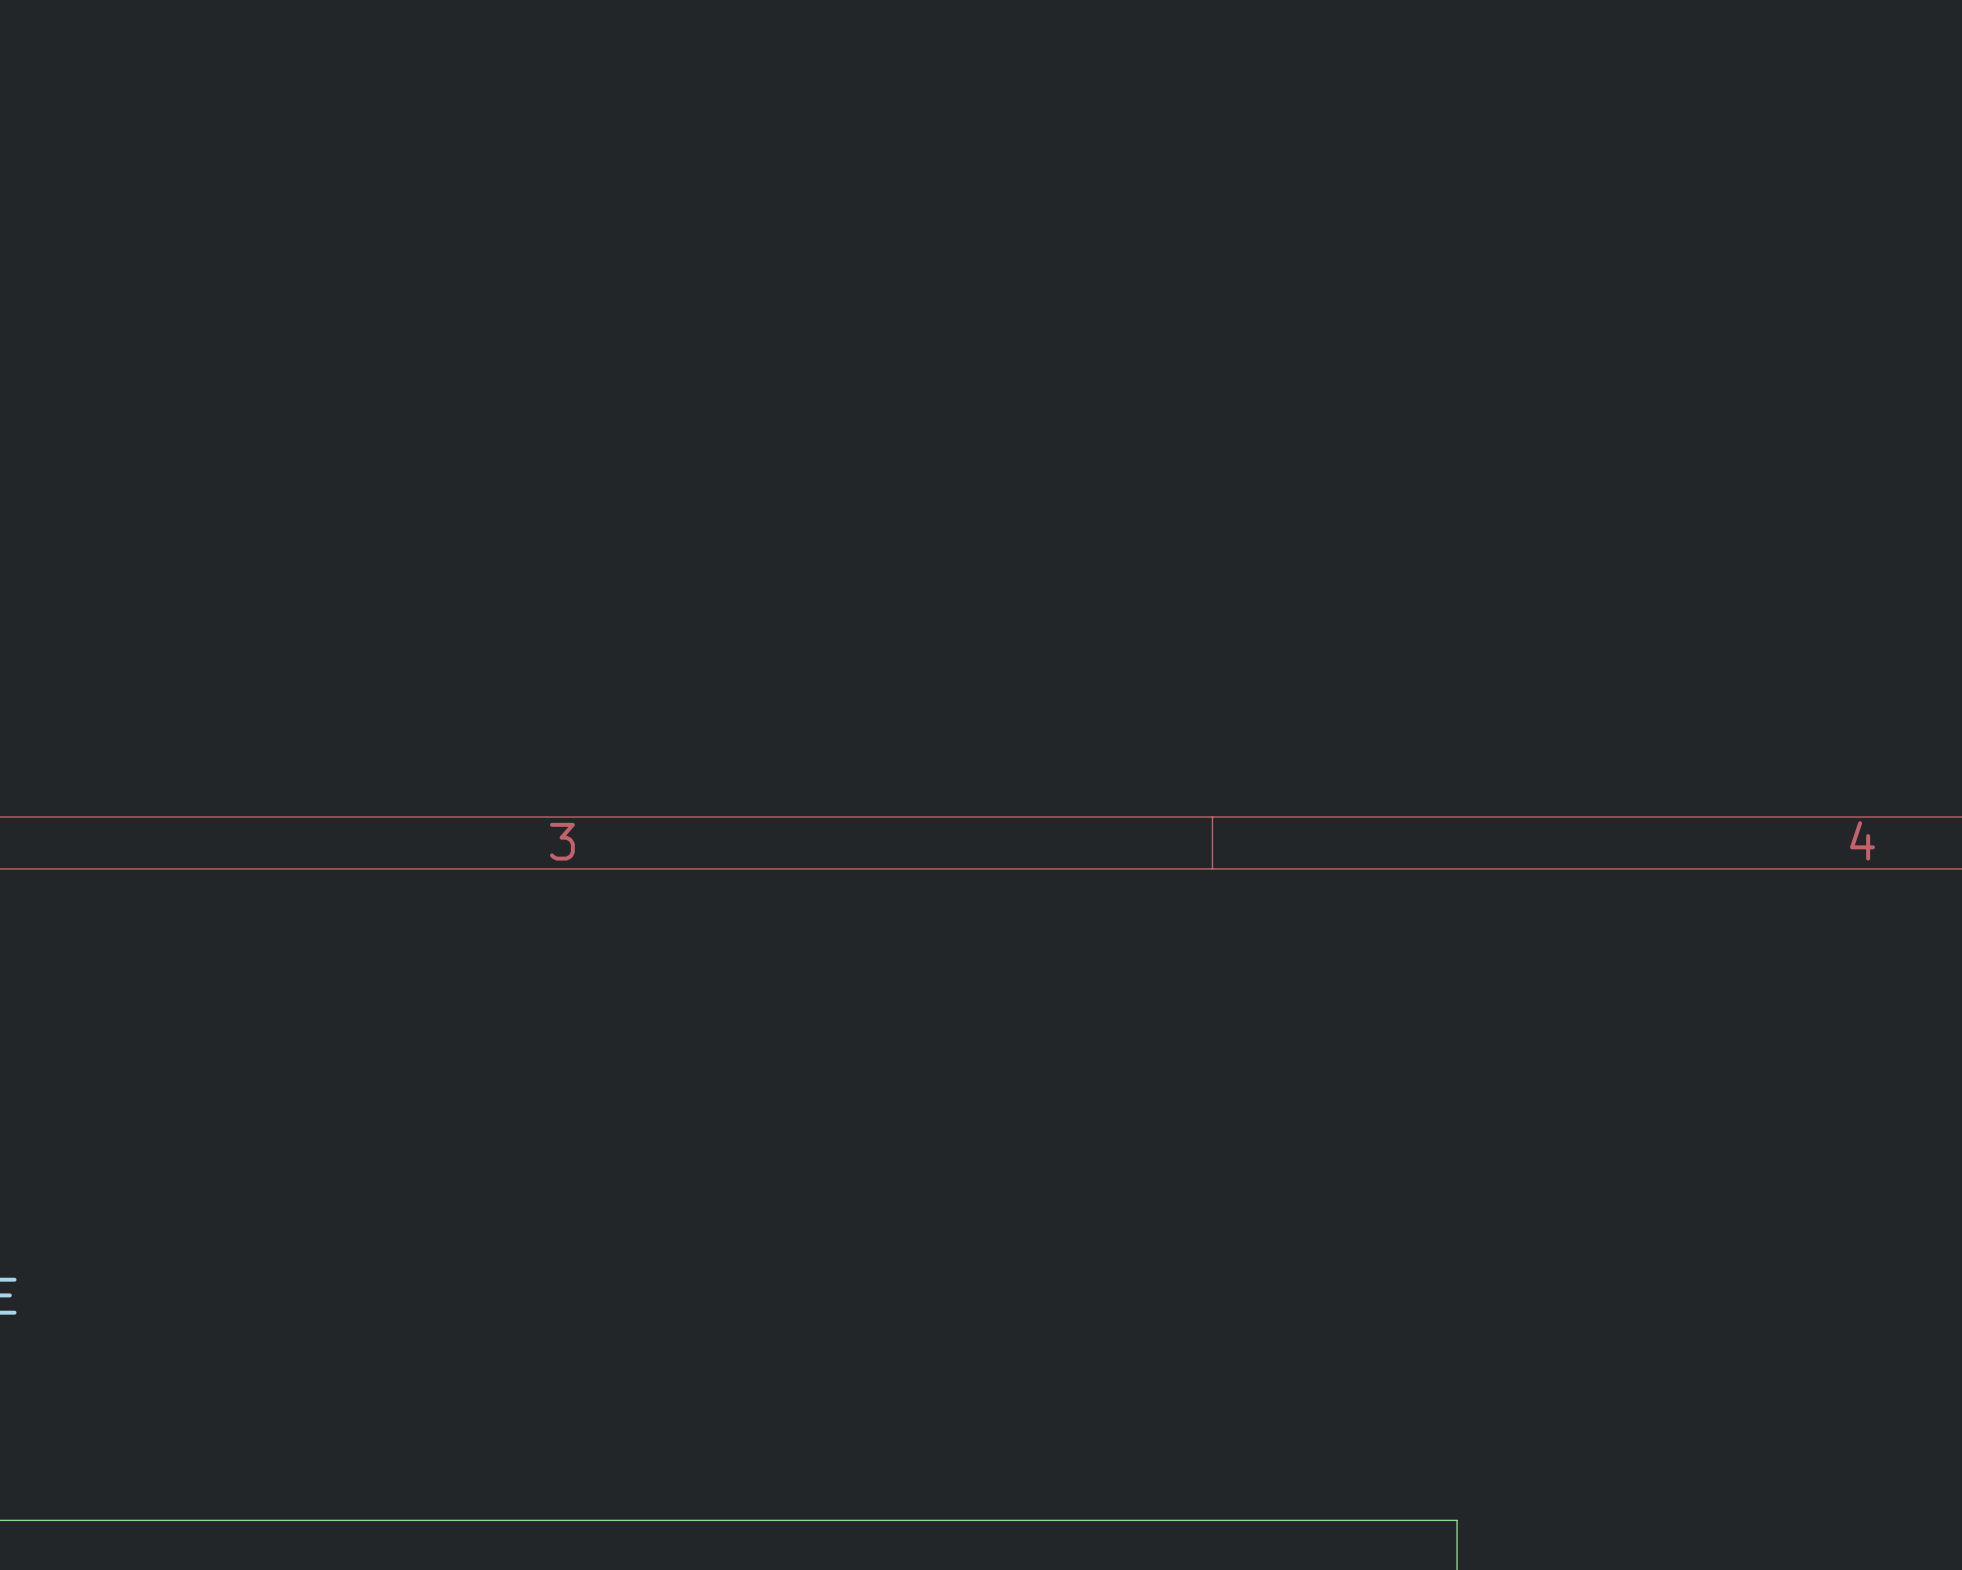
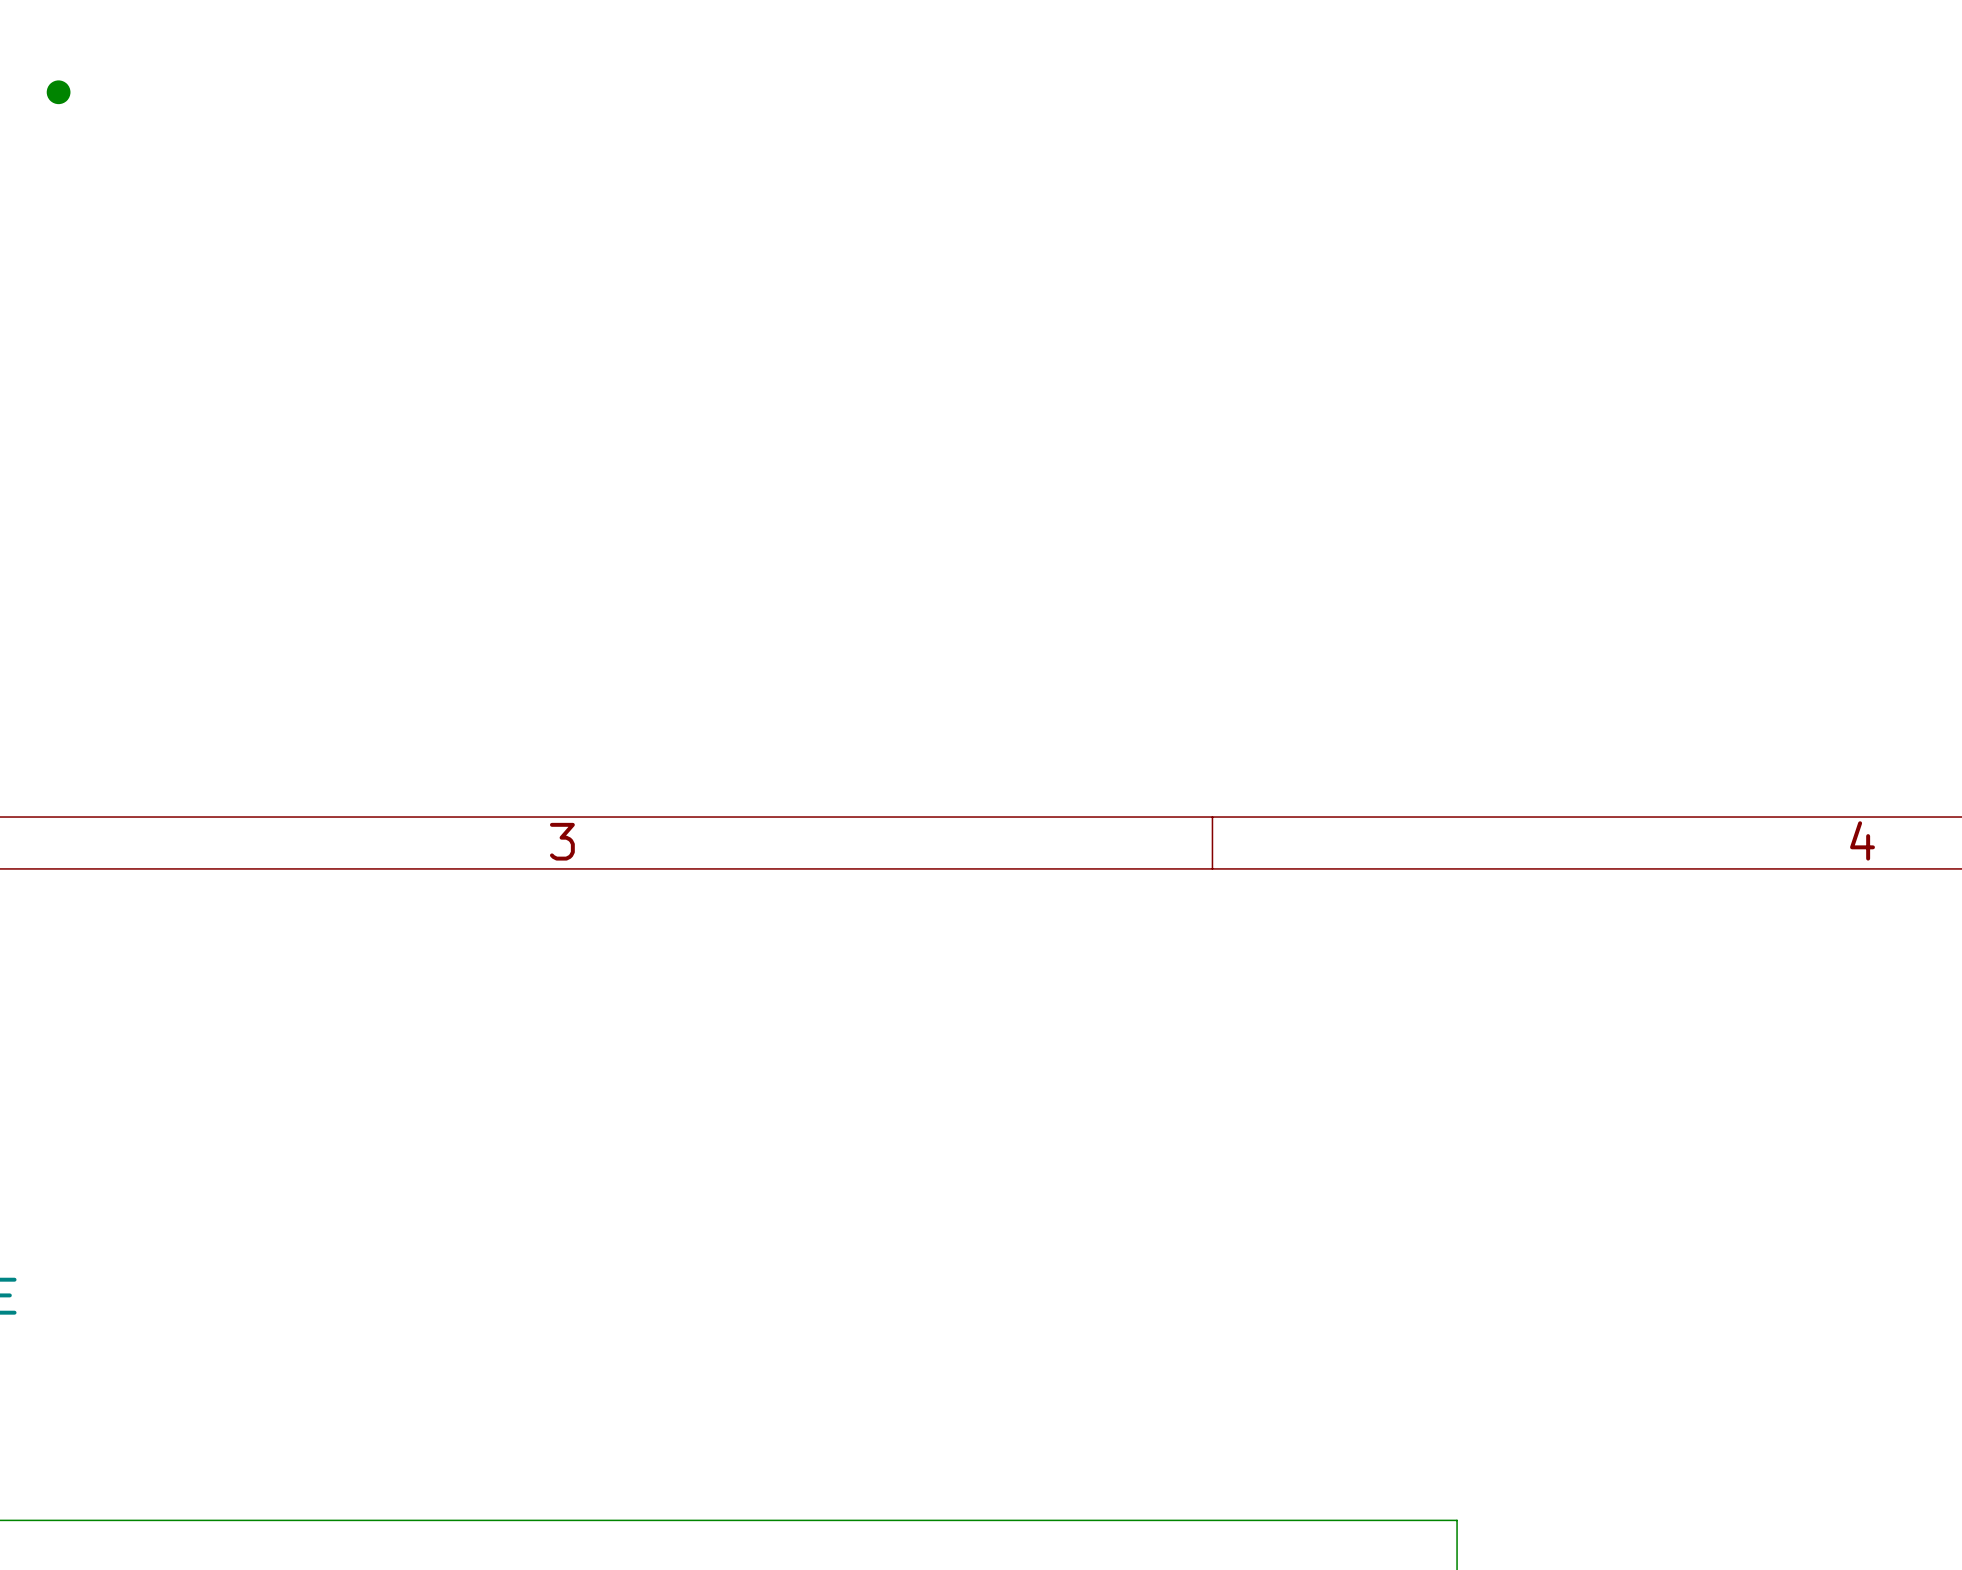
junction: none -> (58, 92)

